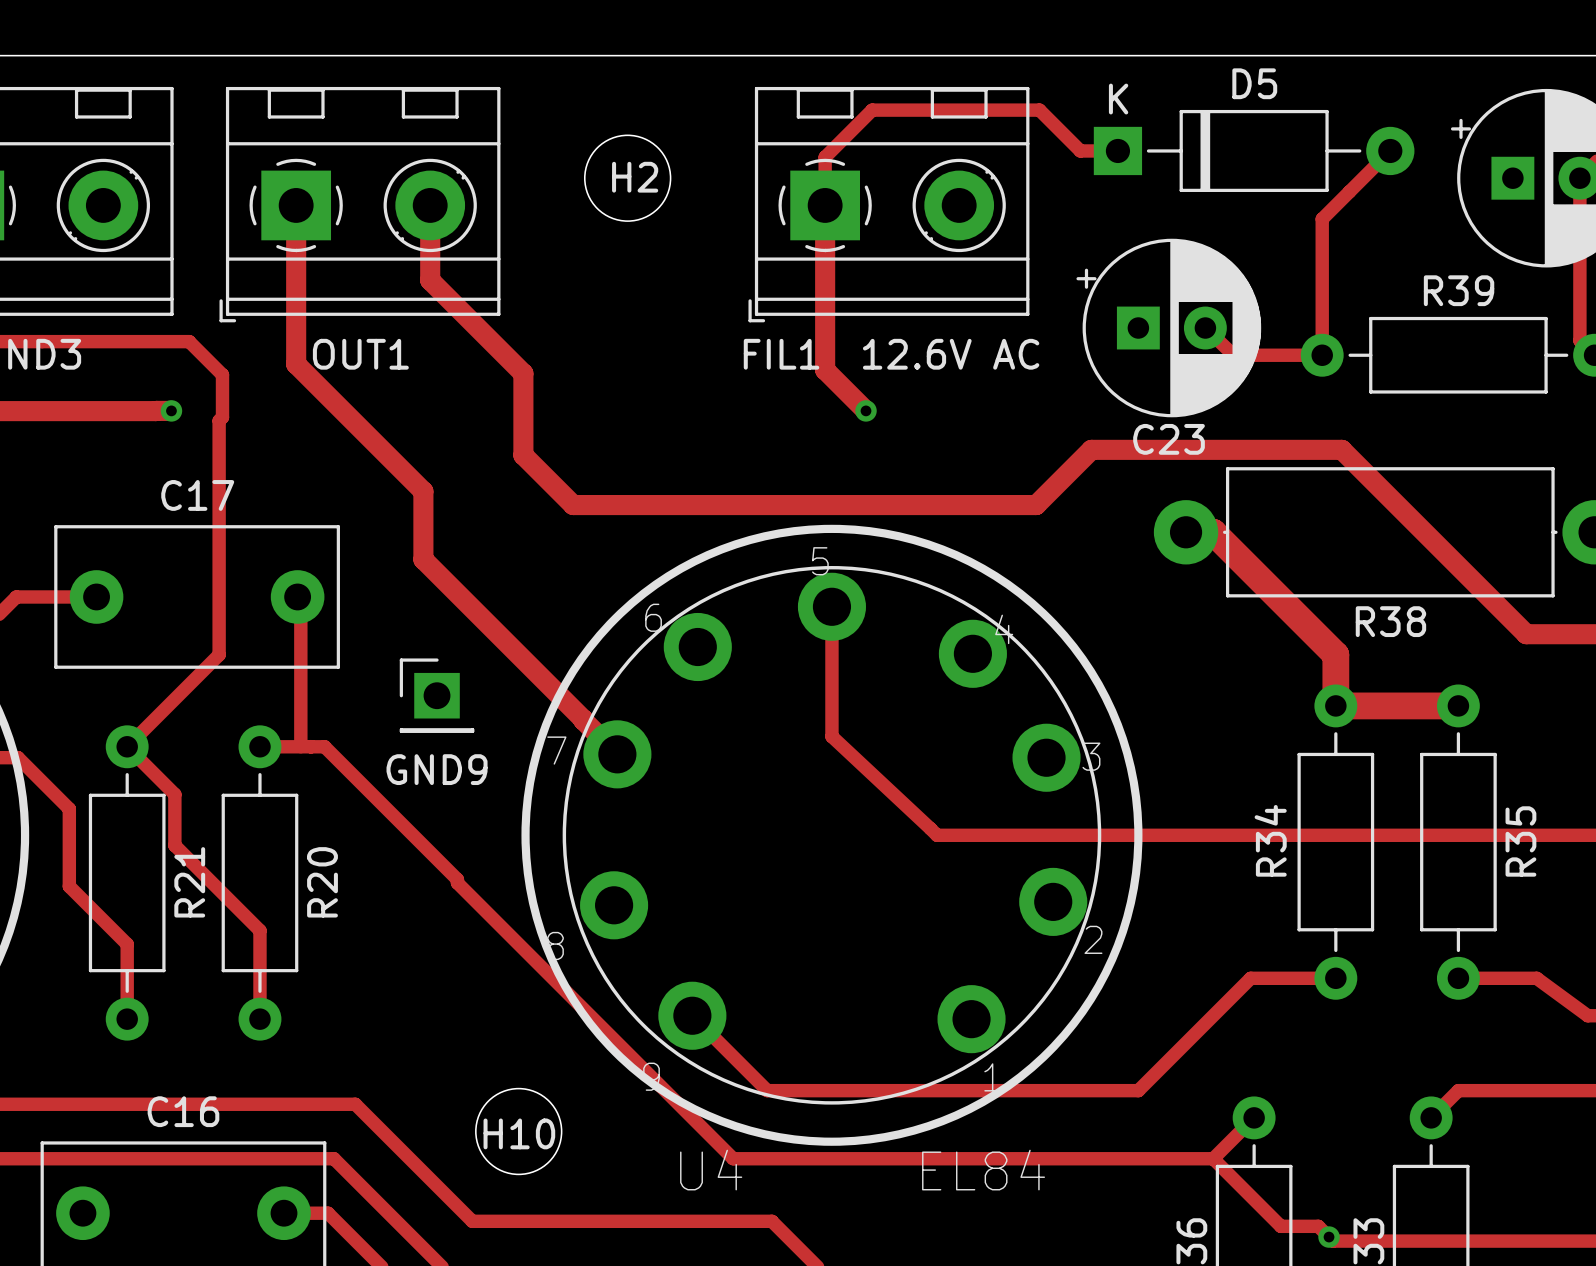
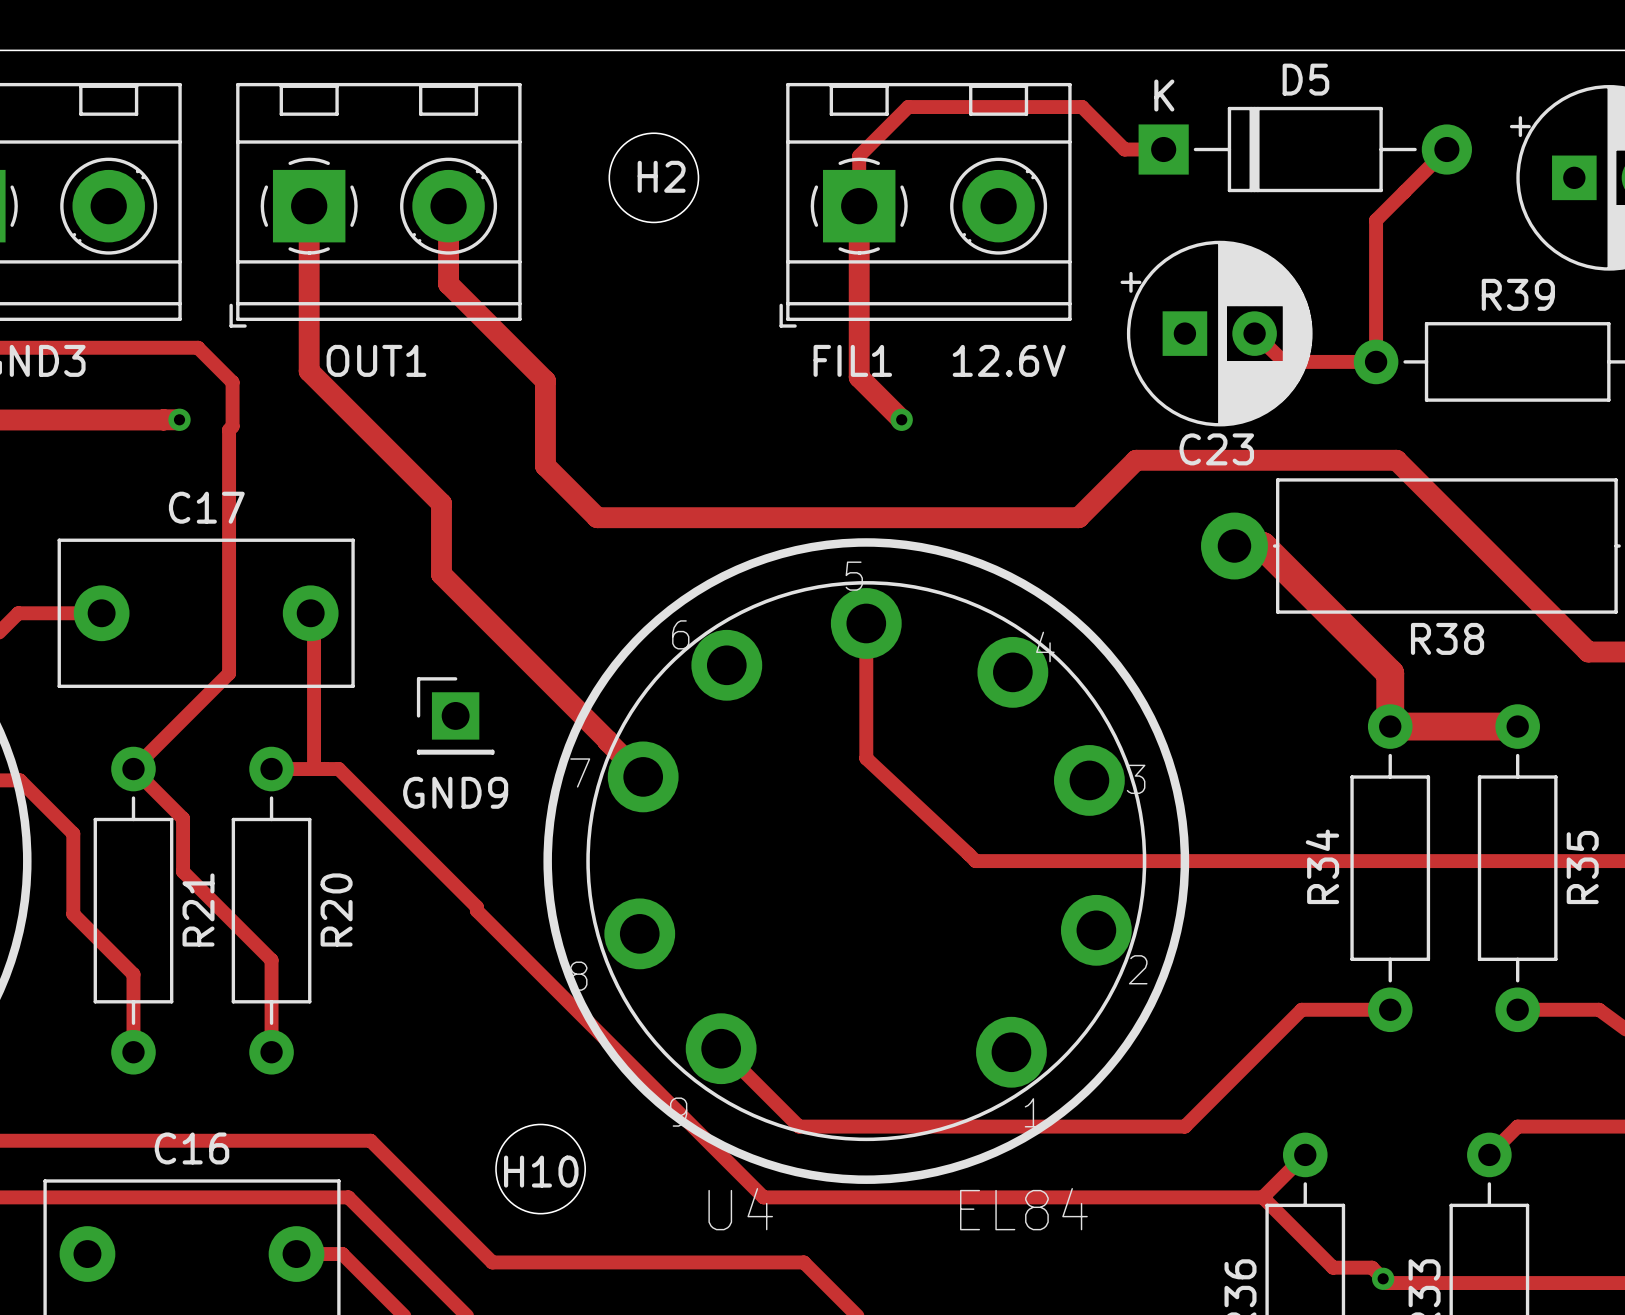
FIL1 name position: FIL1 (781, 354) -> FIL1 (852, 360)
text: 12.6V AC (951, 354) -> 12.6V (1009, 360)

